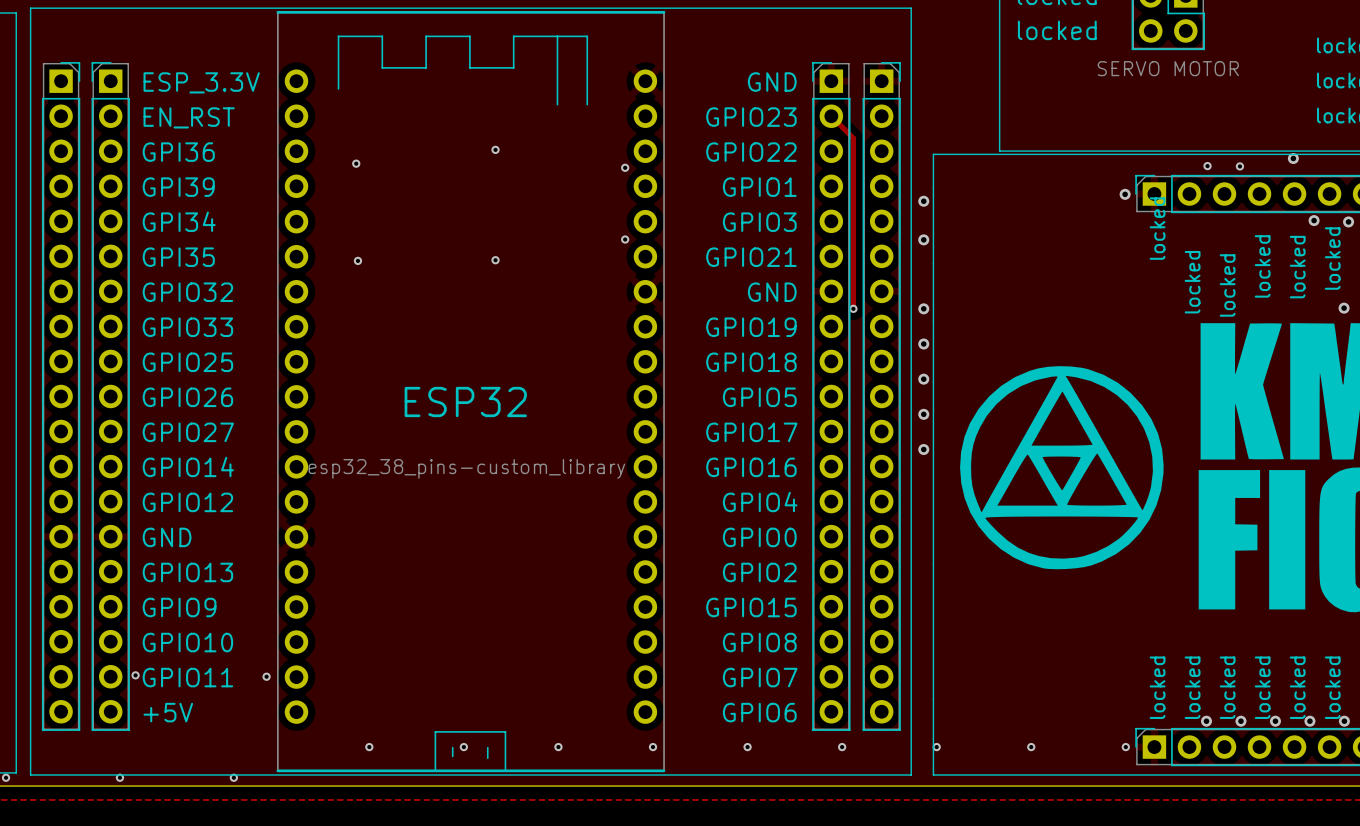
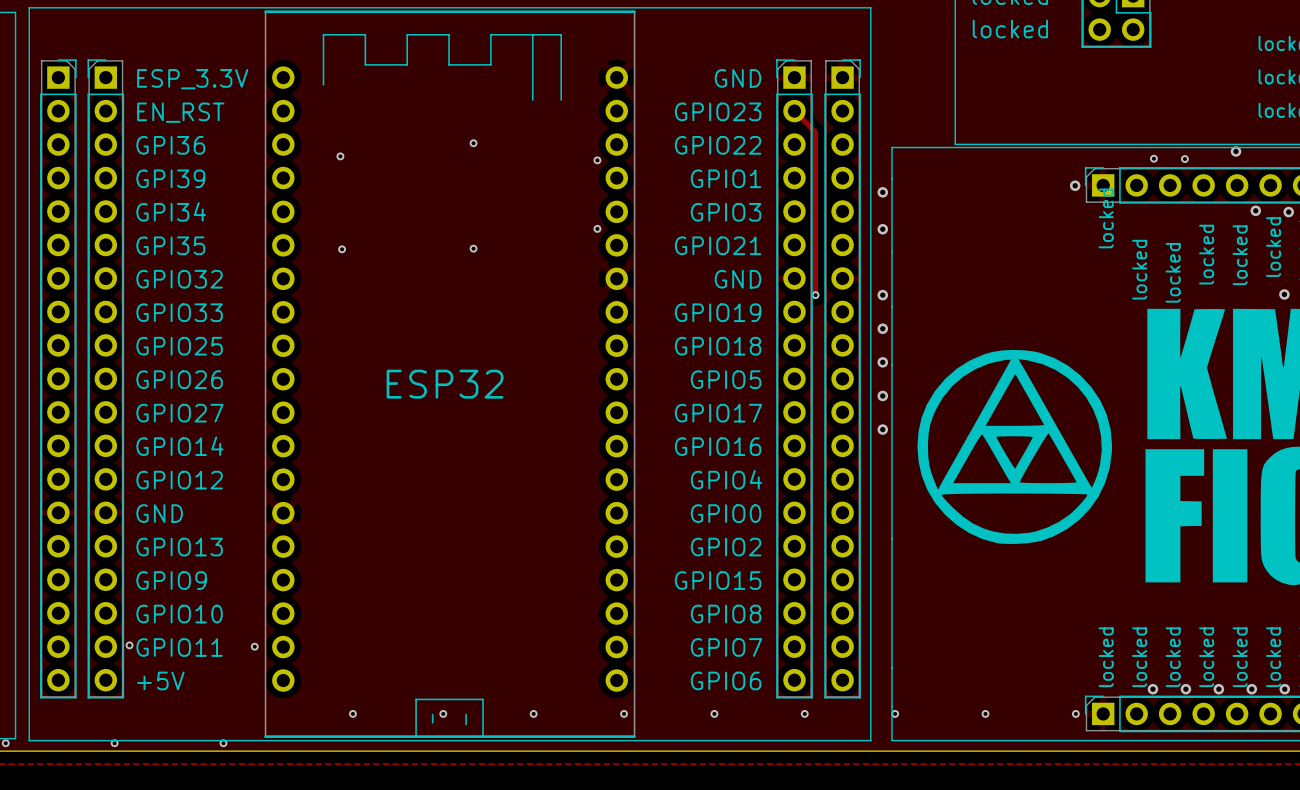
part value: SERVO MOTOR (1168, 68) -> none
part value: esp32_38_pins-custom_library (466, 468) -> none

